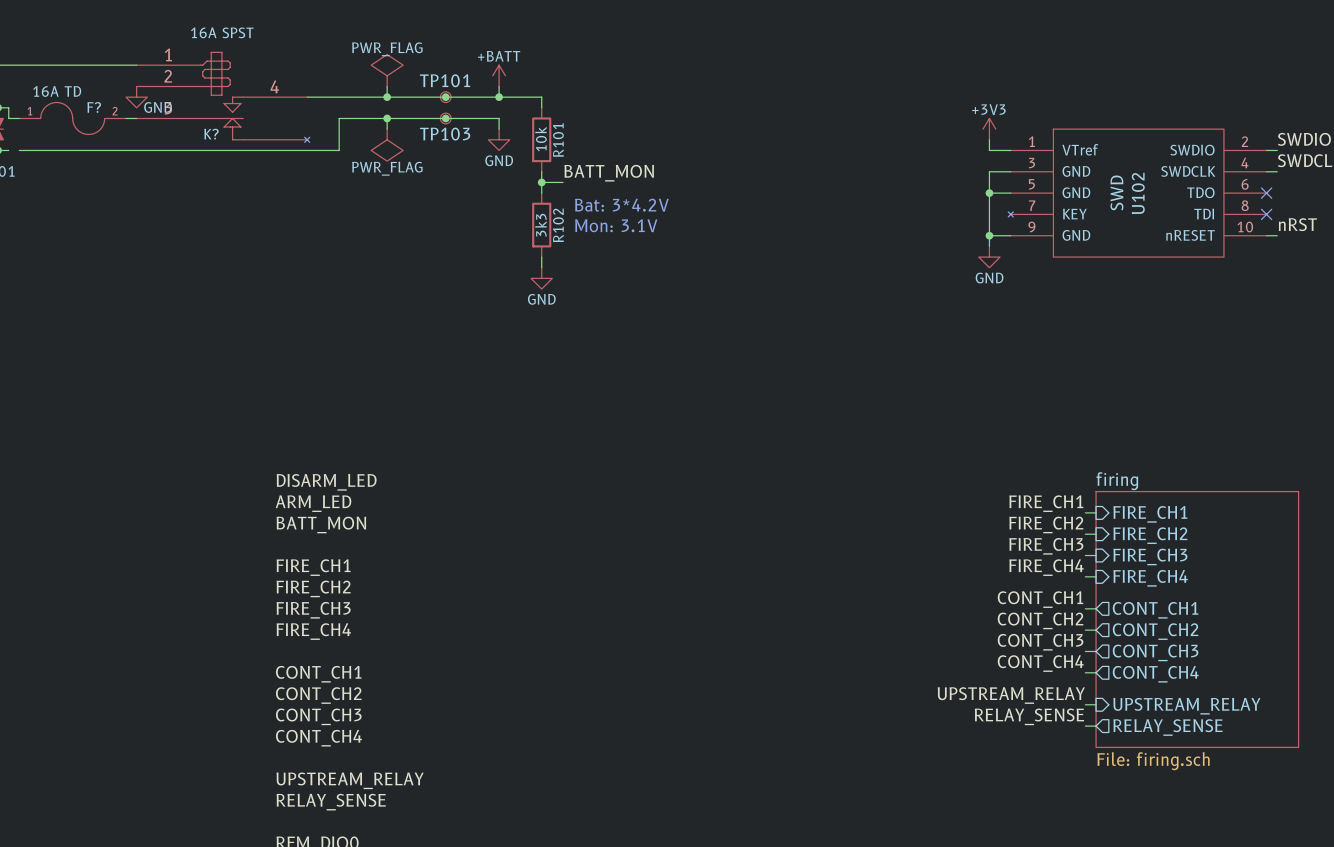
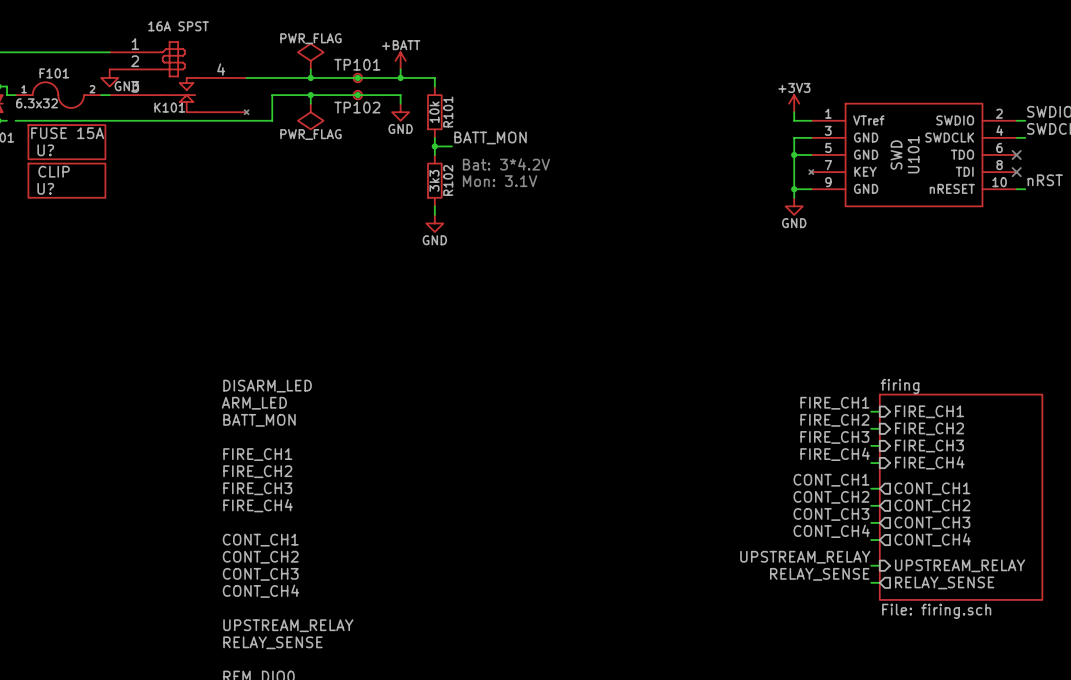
F? value: 16A TD (57, 91) -> 6.3x32 (36, 103)
F? name: F? (94, 107) -> F101 (54, 73)
K? name: K? (211, 134) -> K101 (169, 107)
TP103 name: TP103 (445, 134) -> TP102 (357, 107)
U?: none -> FUSE 15A (66, 142)
U102 name: U102 (1138, 193) -> U101 (913, 154)
U?: none -> CLIP (66, 180)

